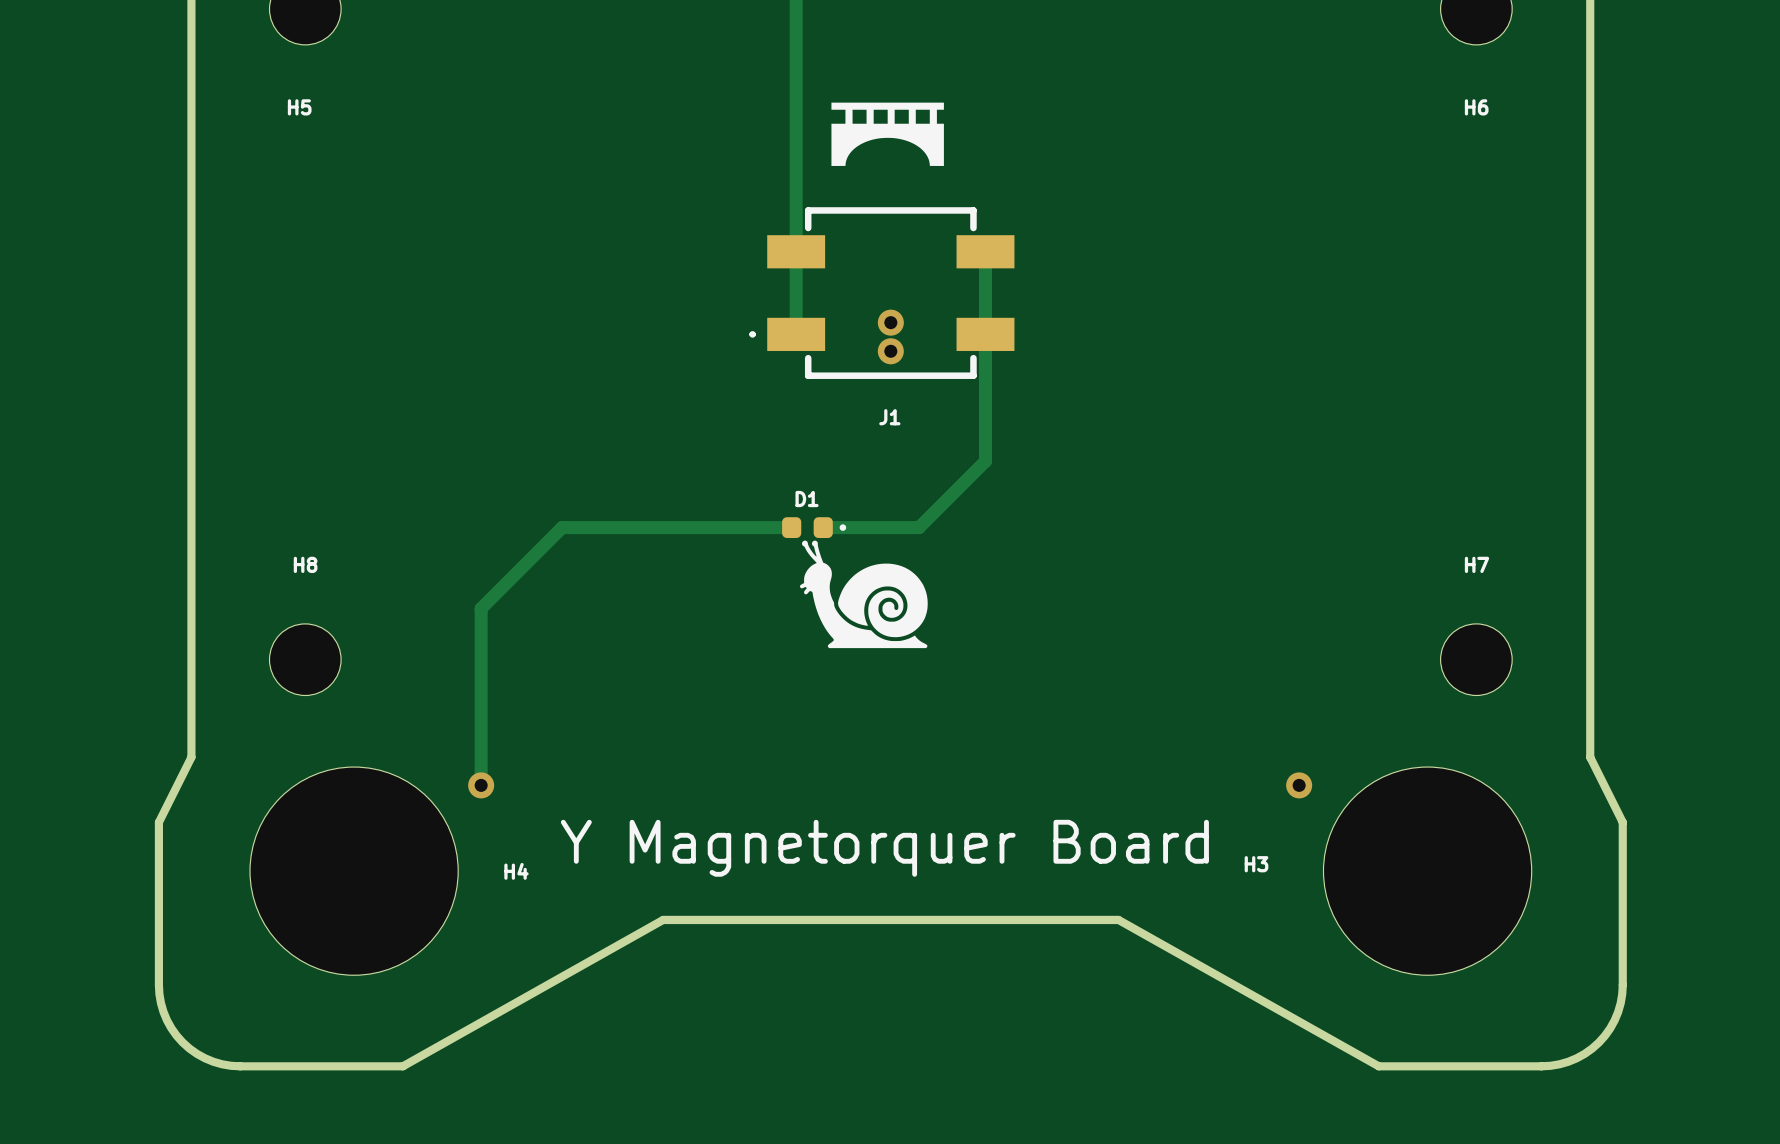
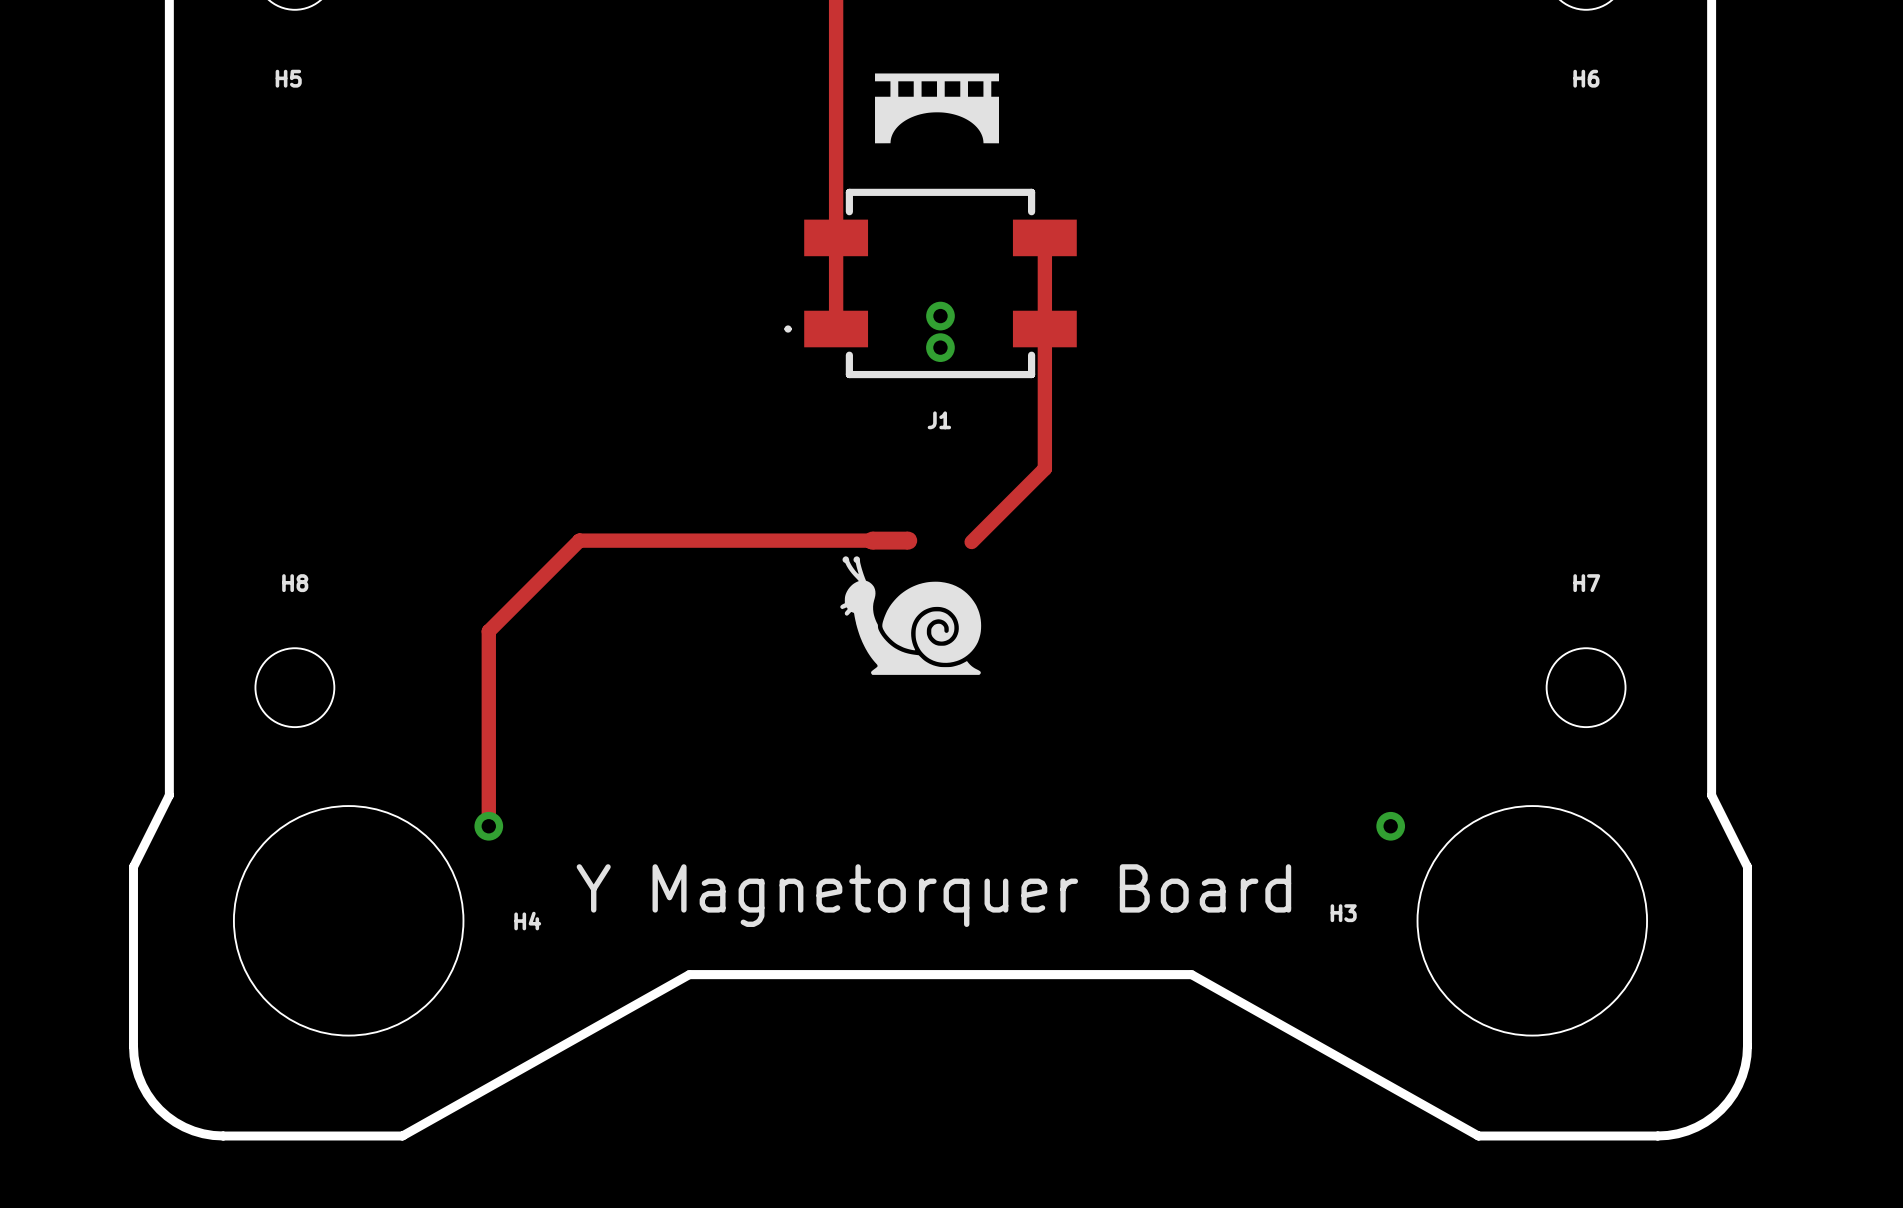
part: none -> (890, 540)
track: (562, 527) (791, 527) -> (578, 542) (872, 540) (870, 542)
D1: (814, 527) -> none
track: (823, 527) (919, 527) -> none

